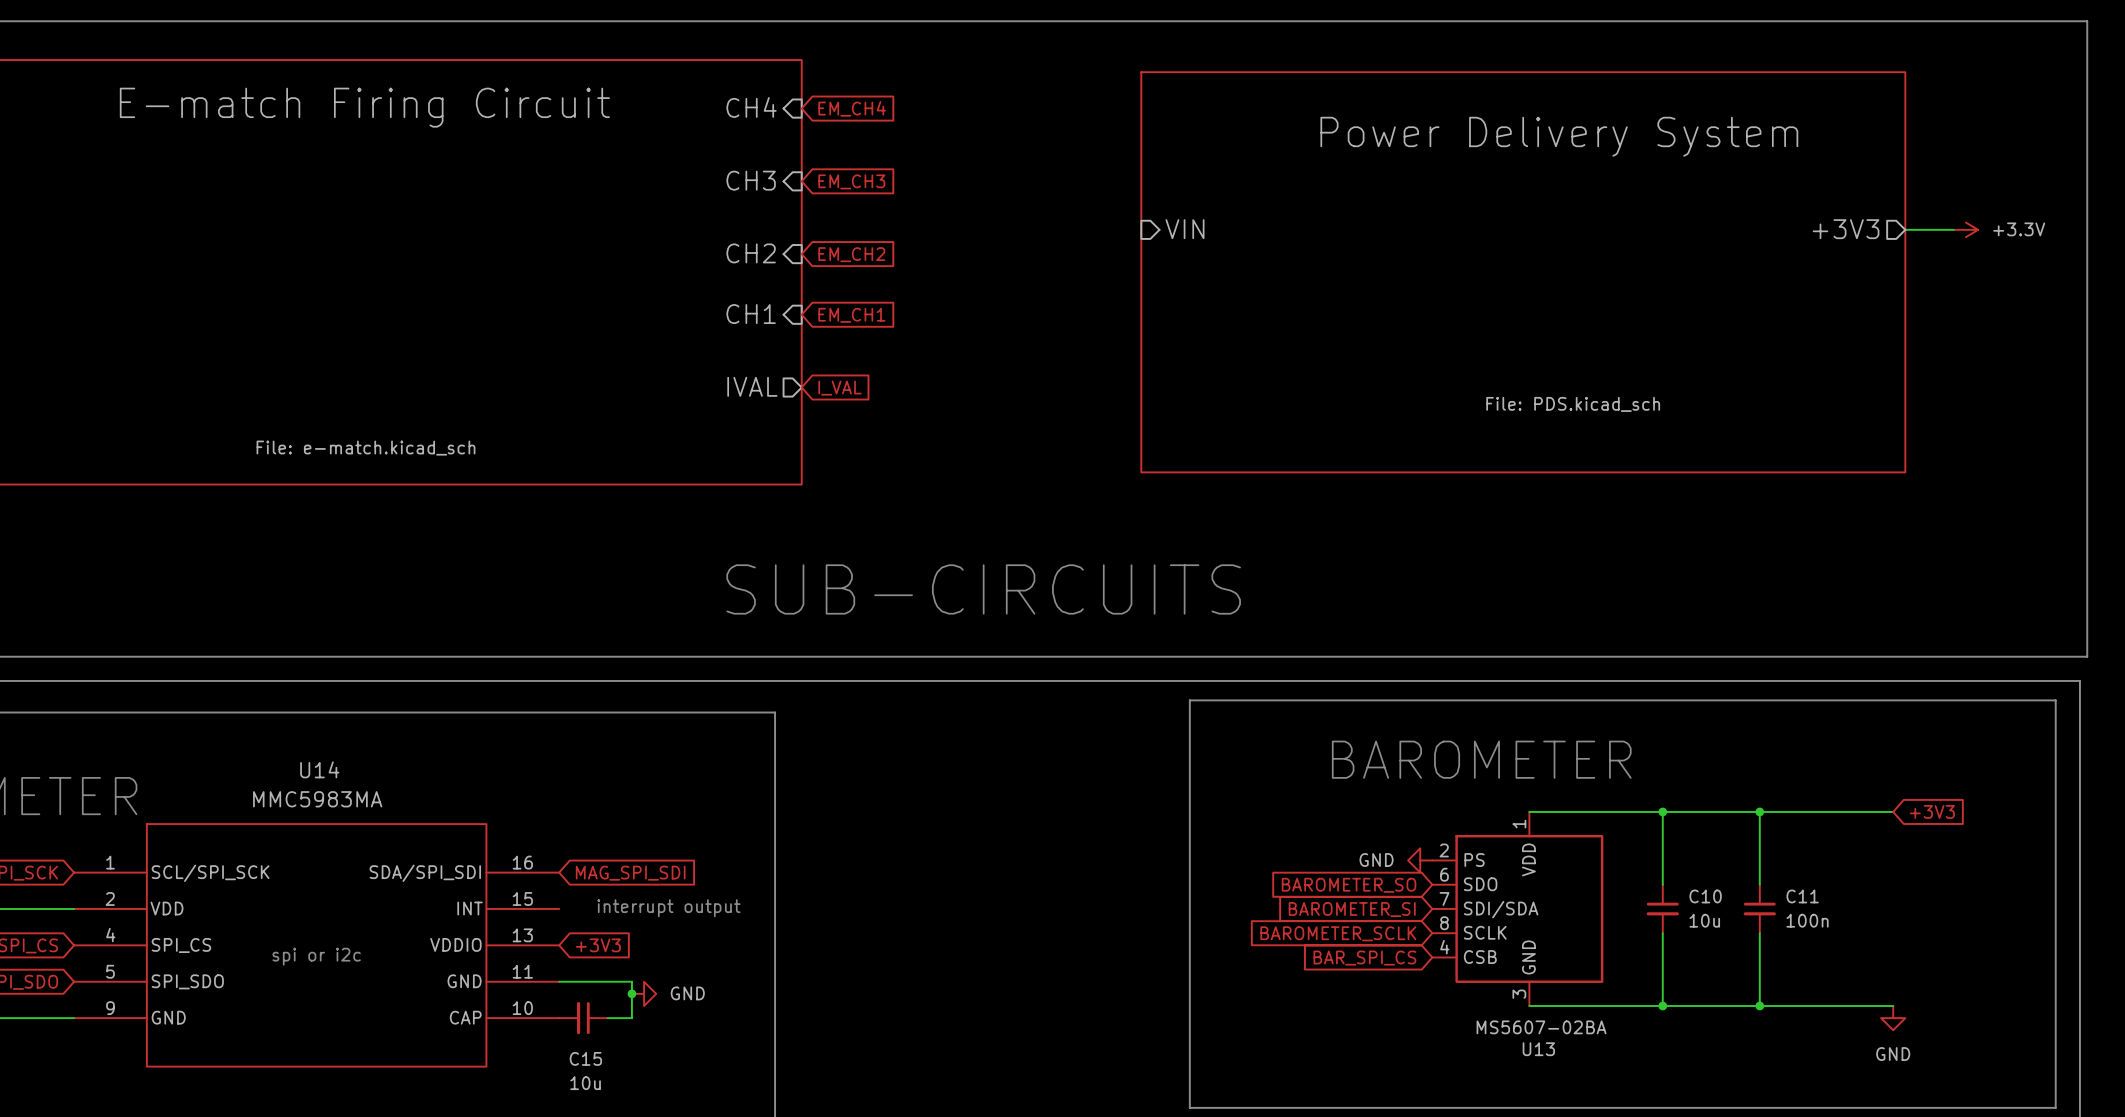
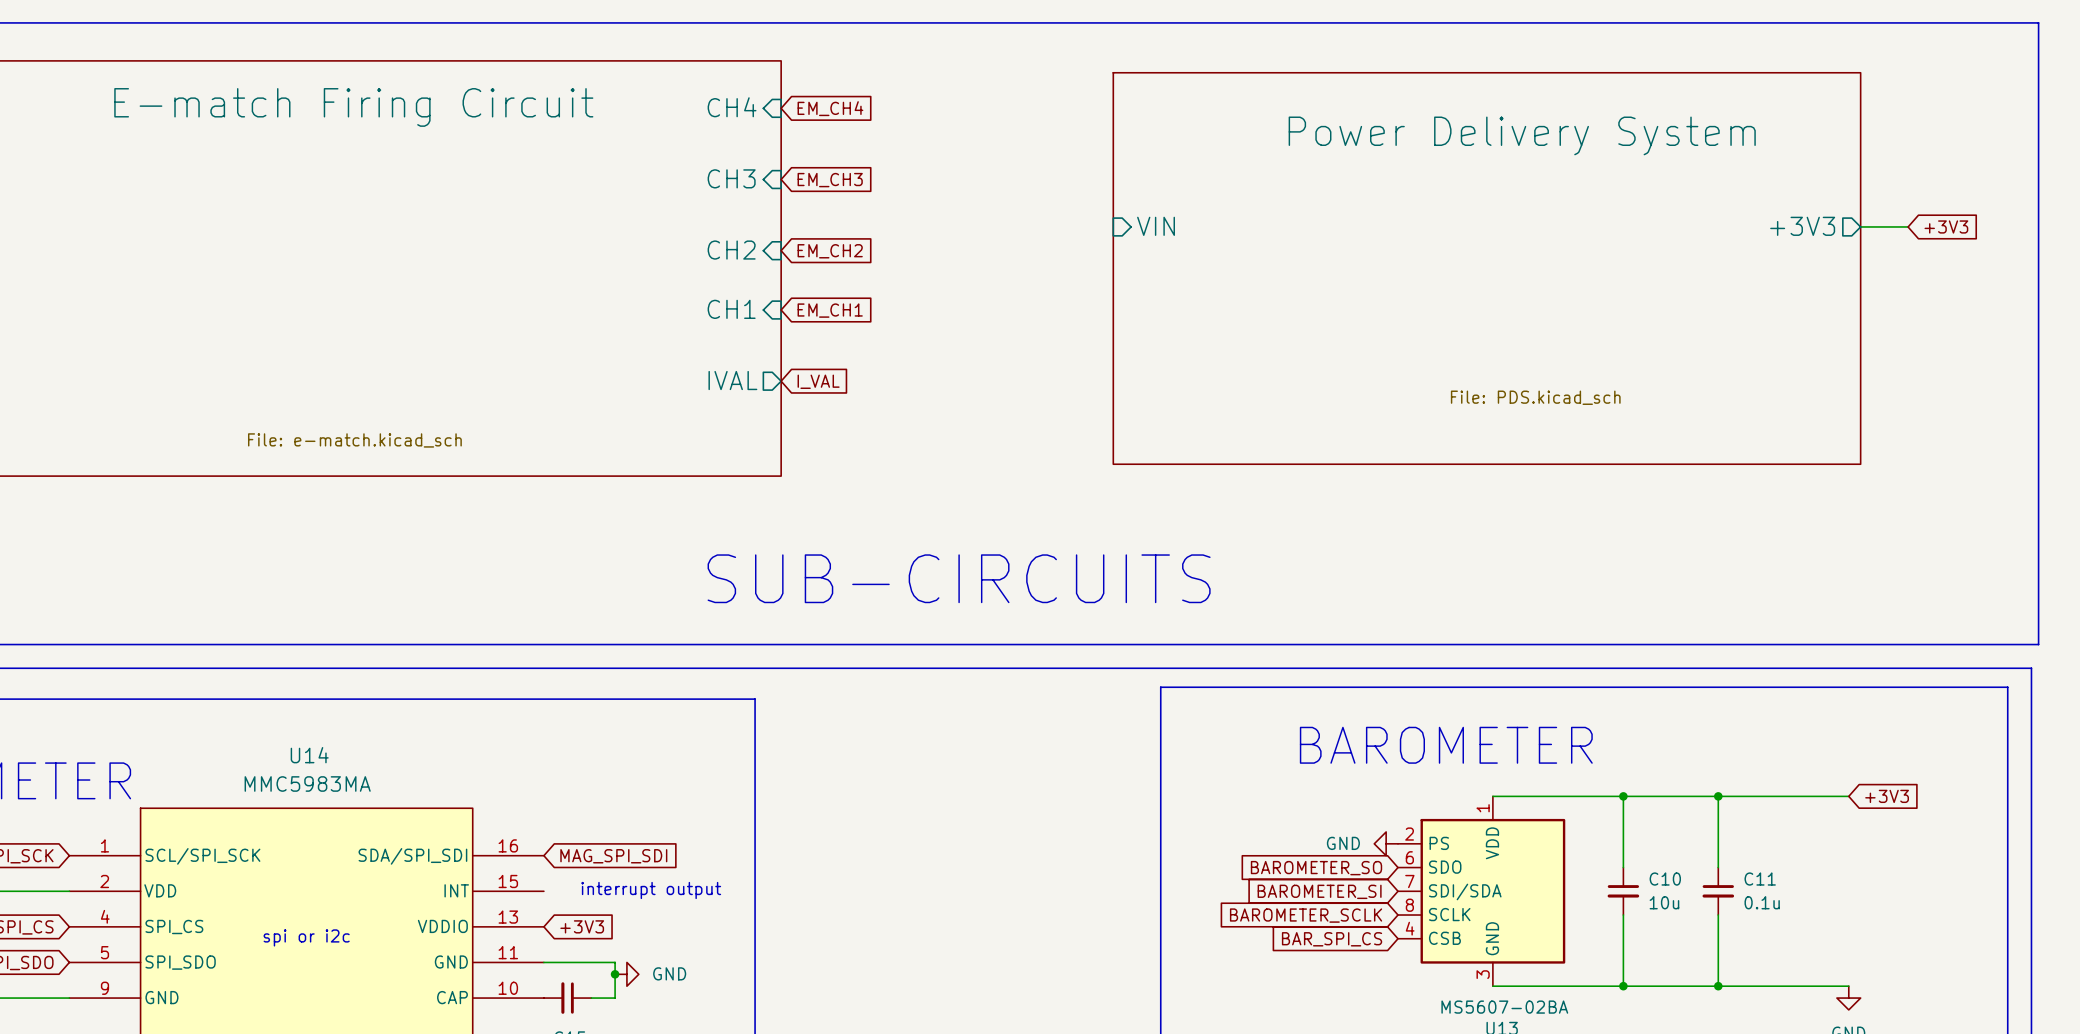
power symbol: +3.3V (1965, 229) -> none
global label: none -> +3V3 (1946, 226)
C11 value: 100n (1807, 920) -> 0.1u (1762, 902)

